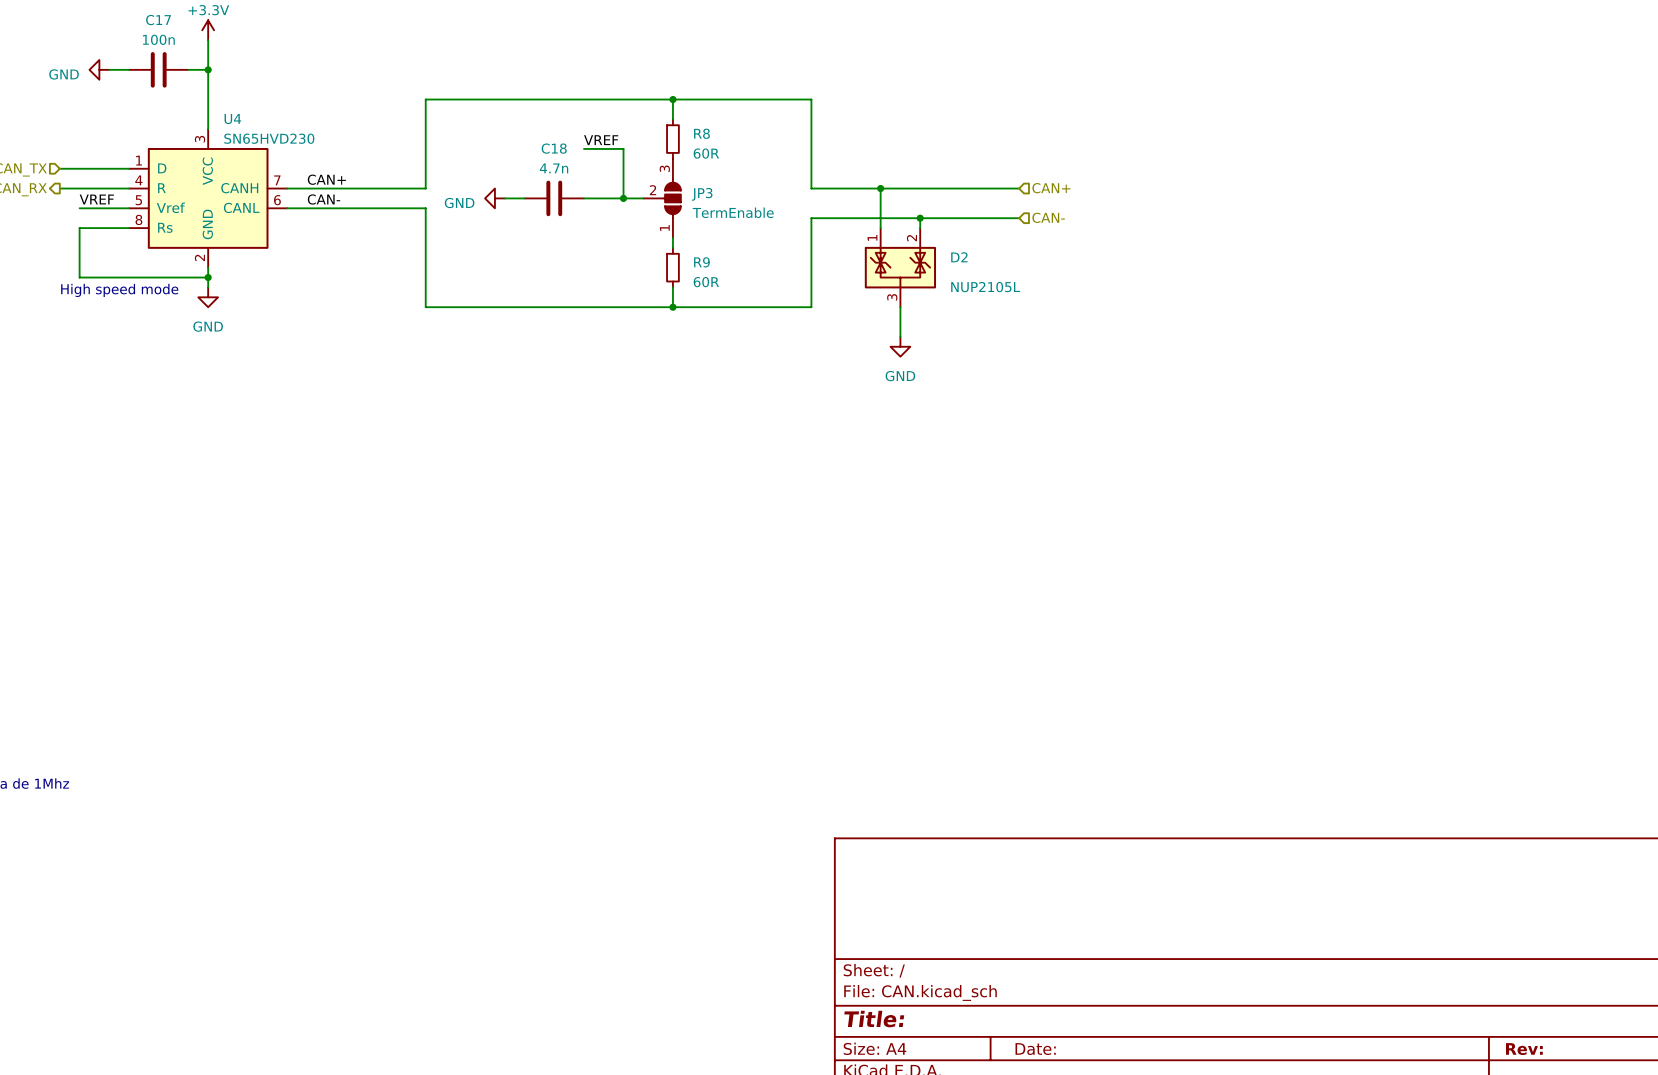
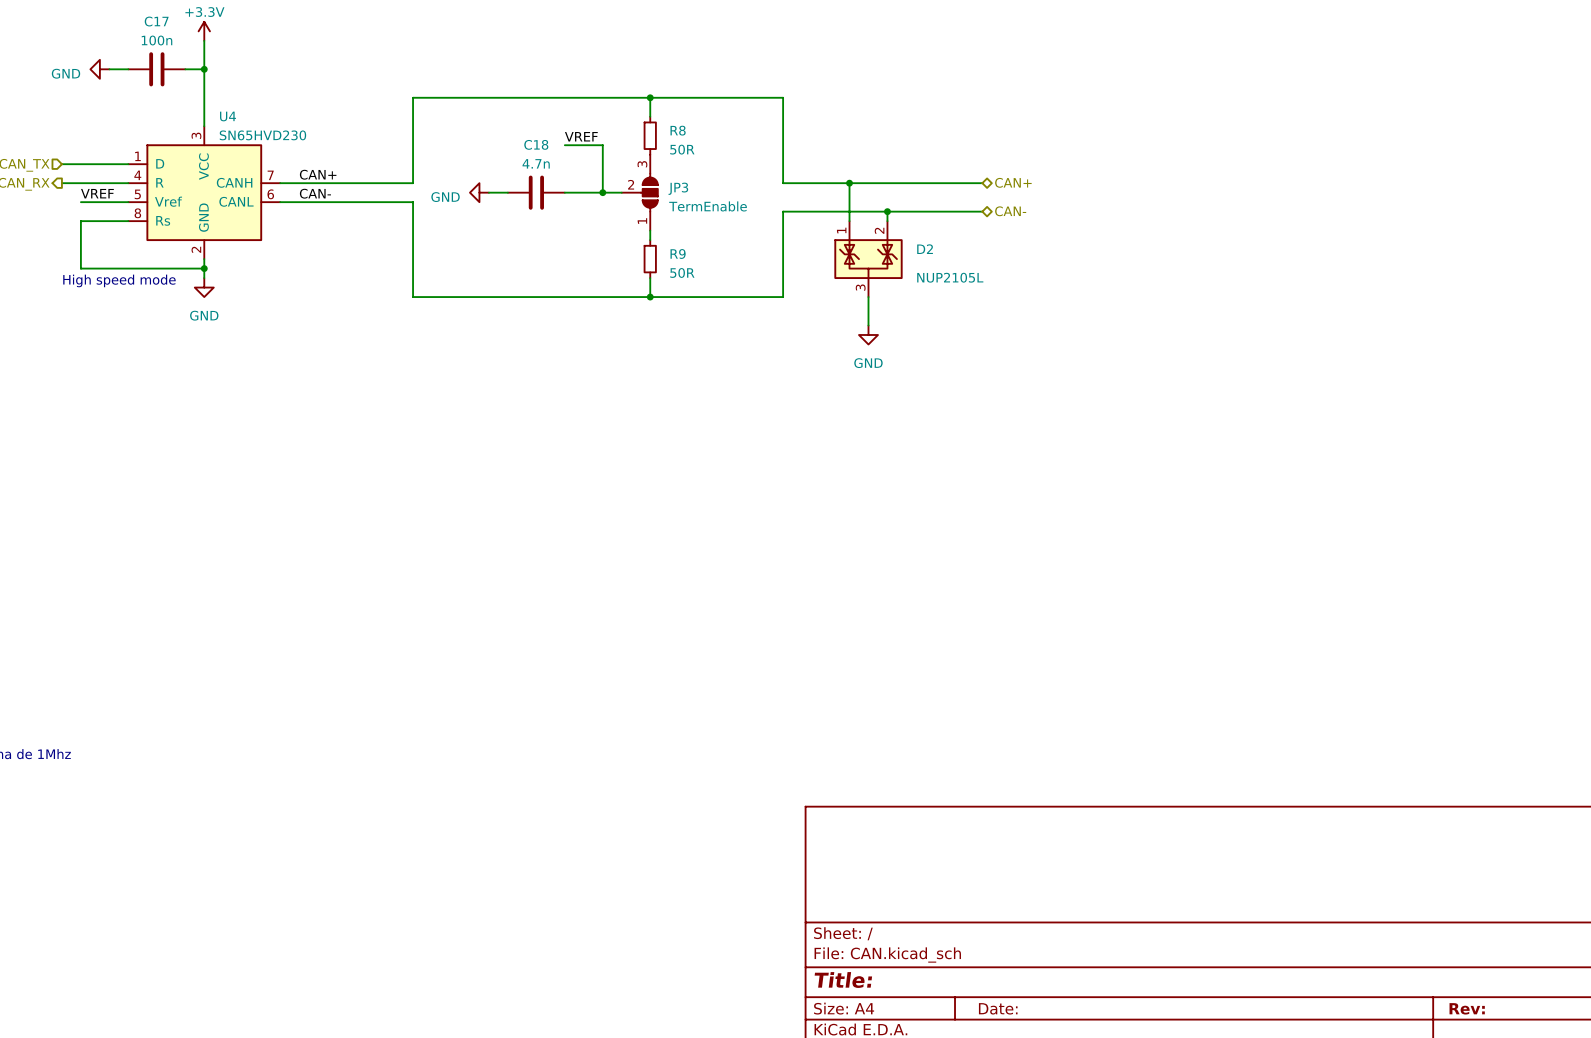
R8 value: 60R (706, 153) -> 50R (682, 149)
hierarchical label shape: input (1051, 188) -> bidirectional (1013, 182)
hierarchical label shape: input (1048, 217) -> bidirectional (1010, 211)
R9 value: 60R (706, 282) -> 50R (682, 272)

